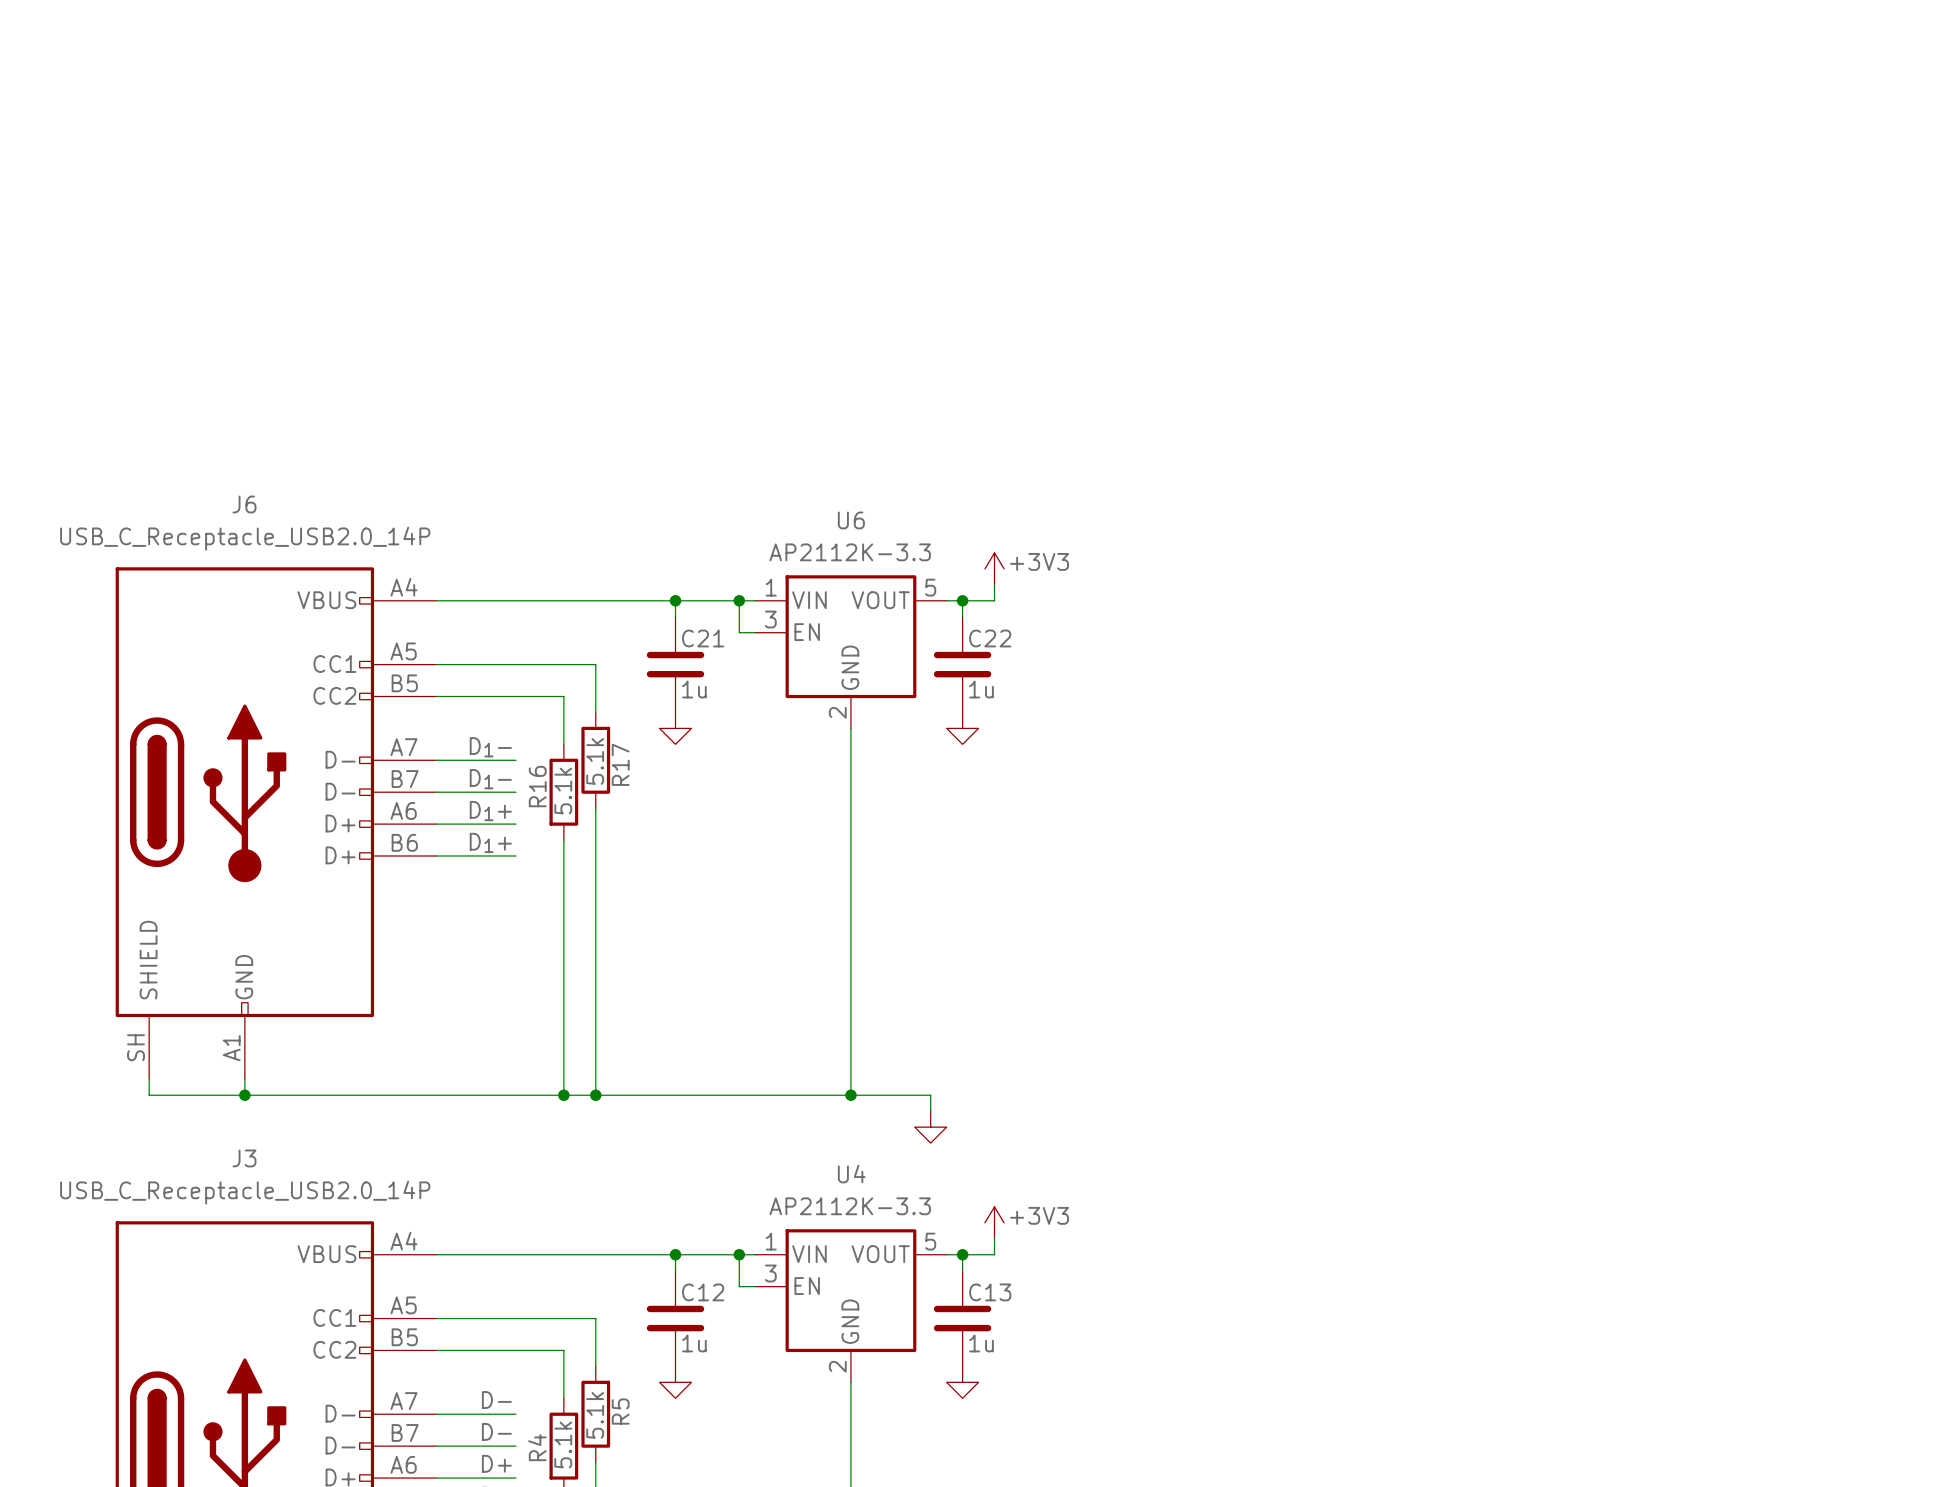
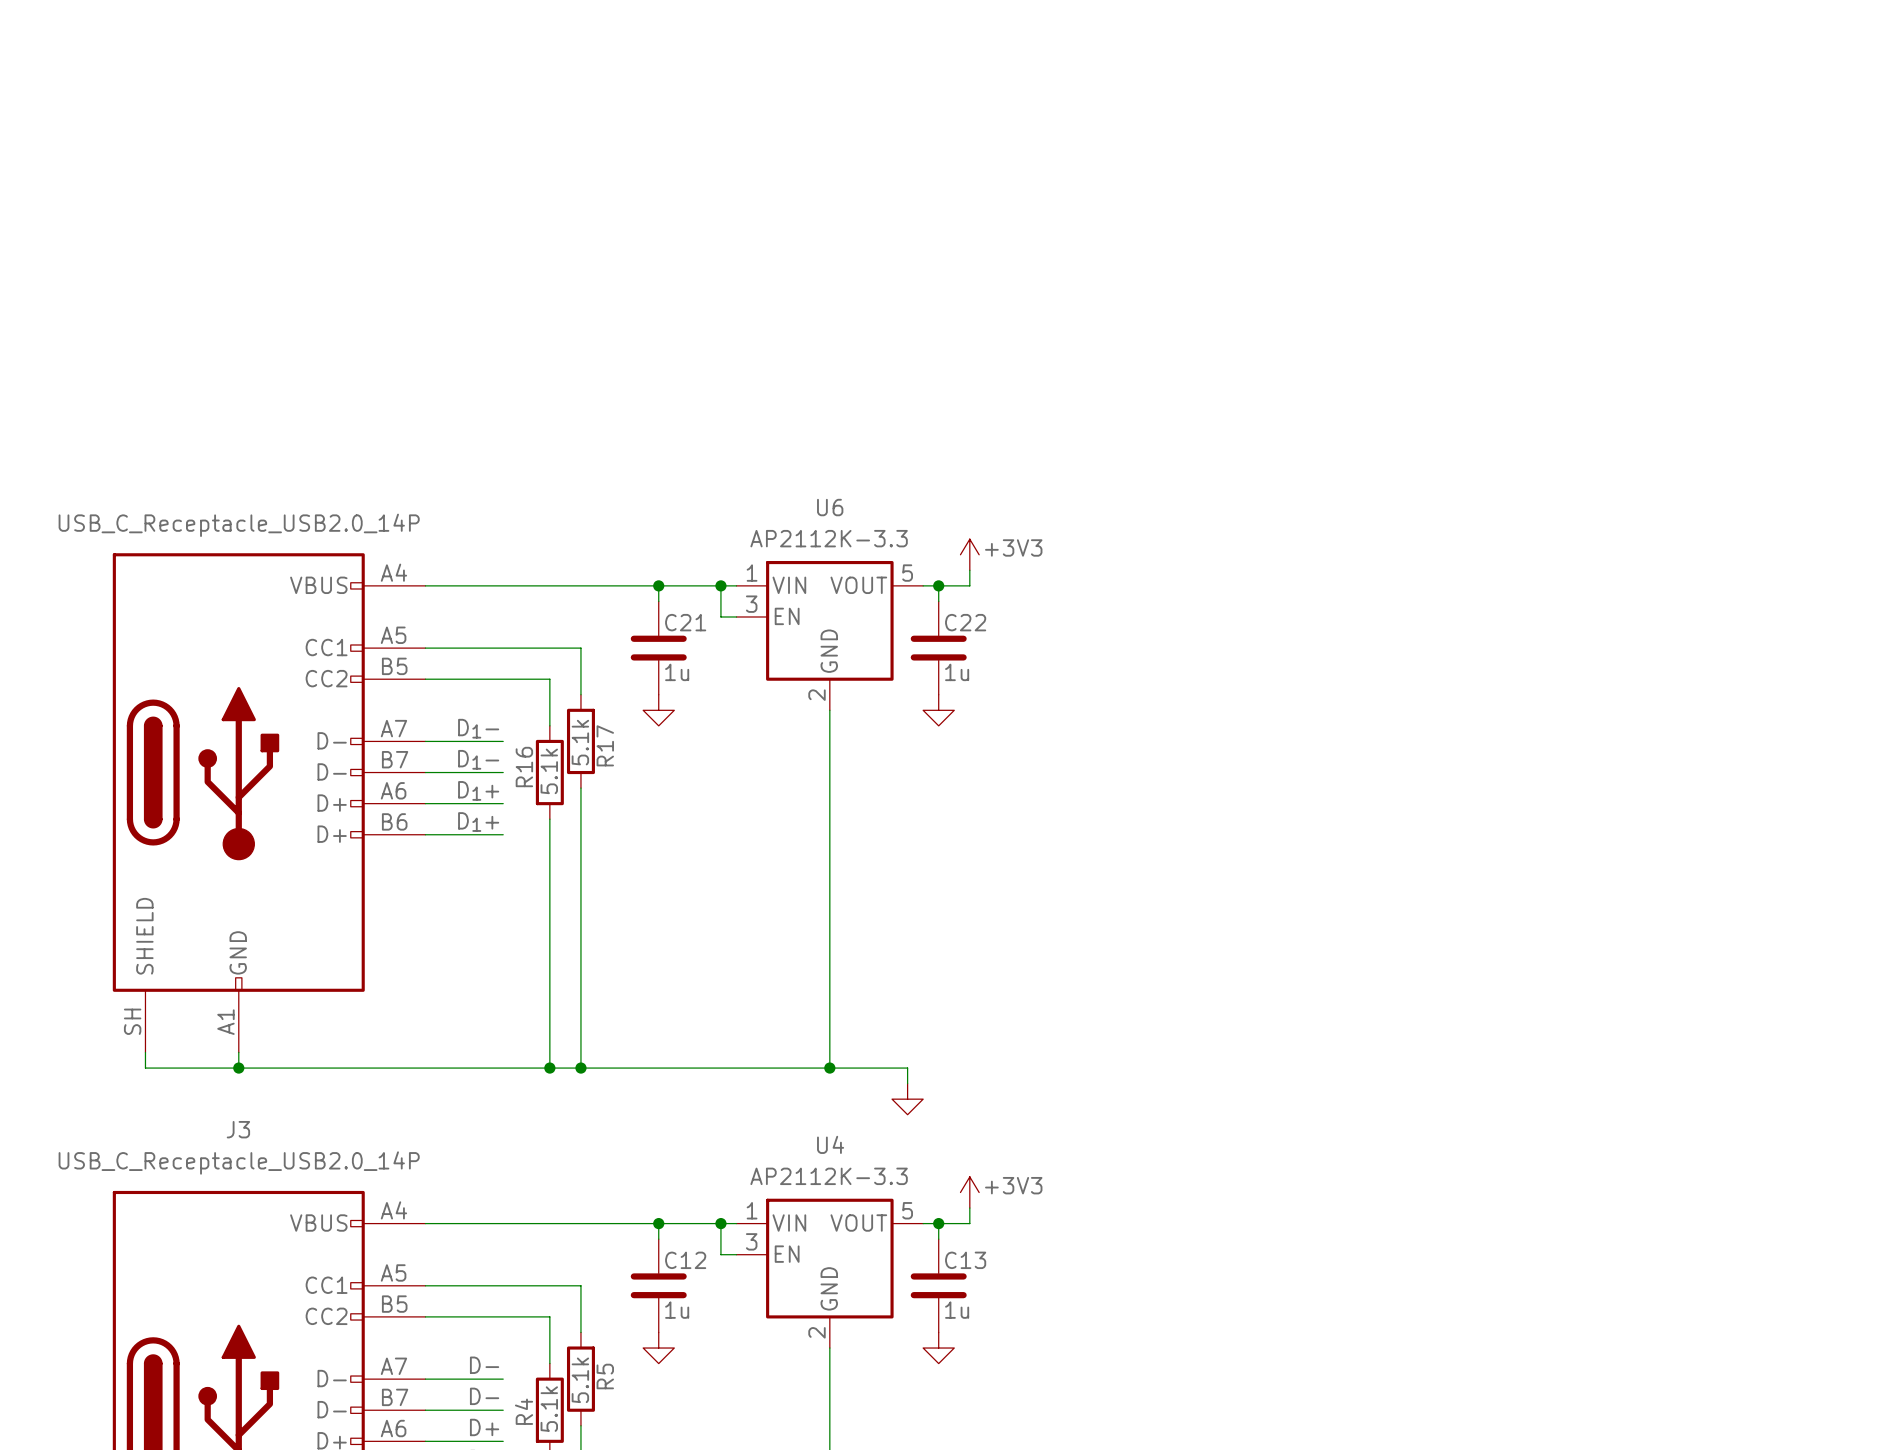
J6 name: J6 (244, 504) -> none

